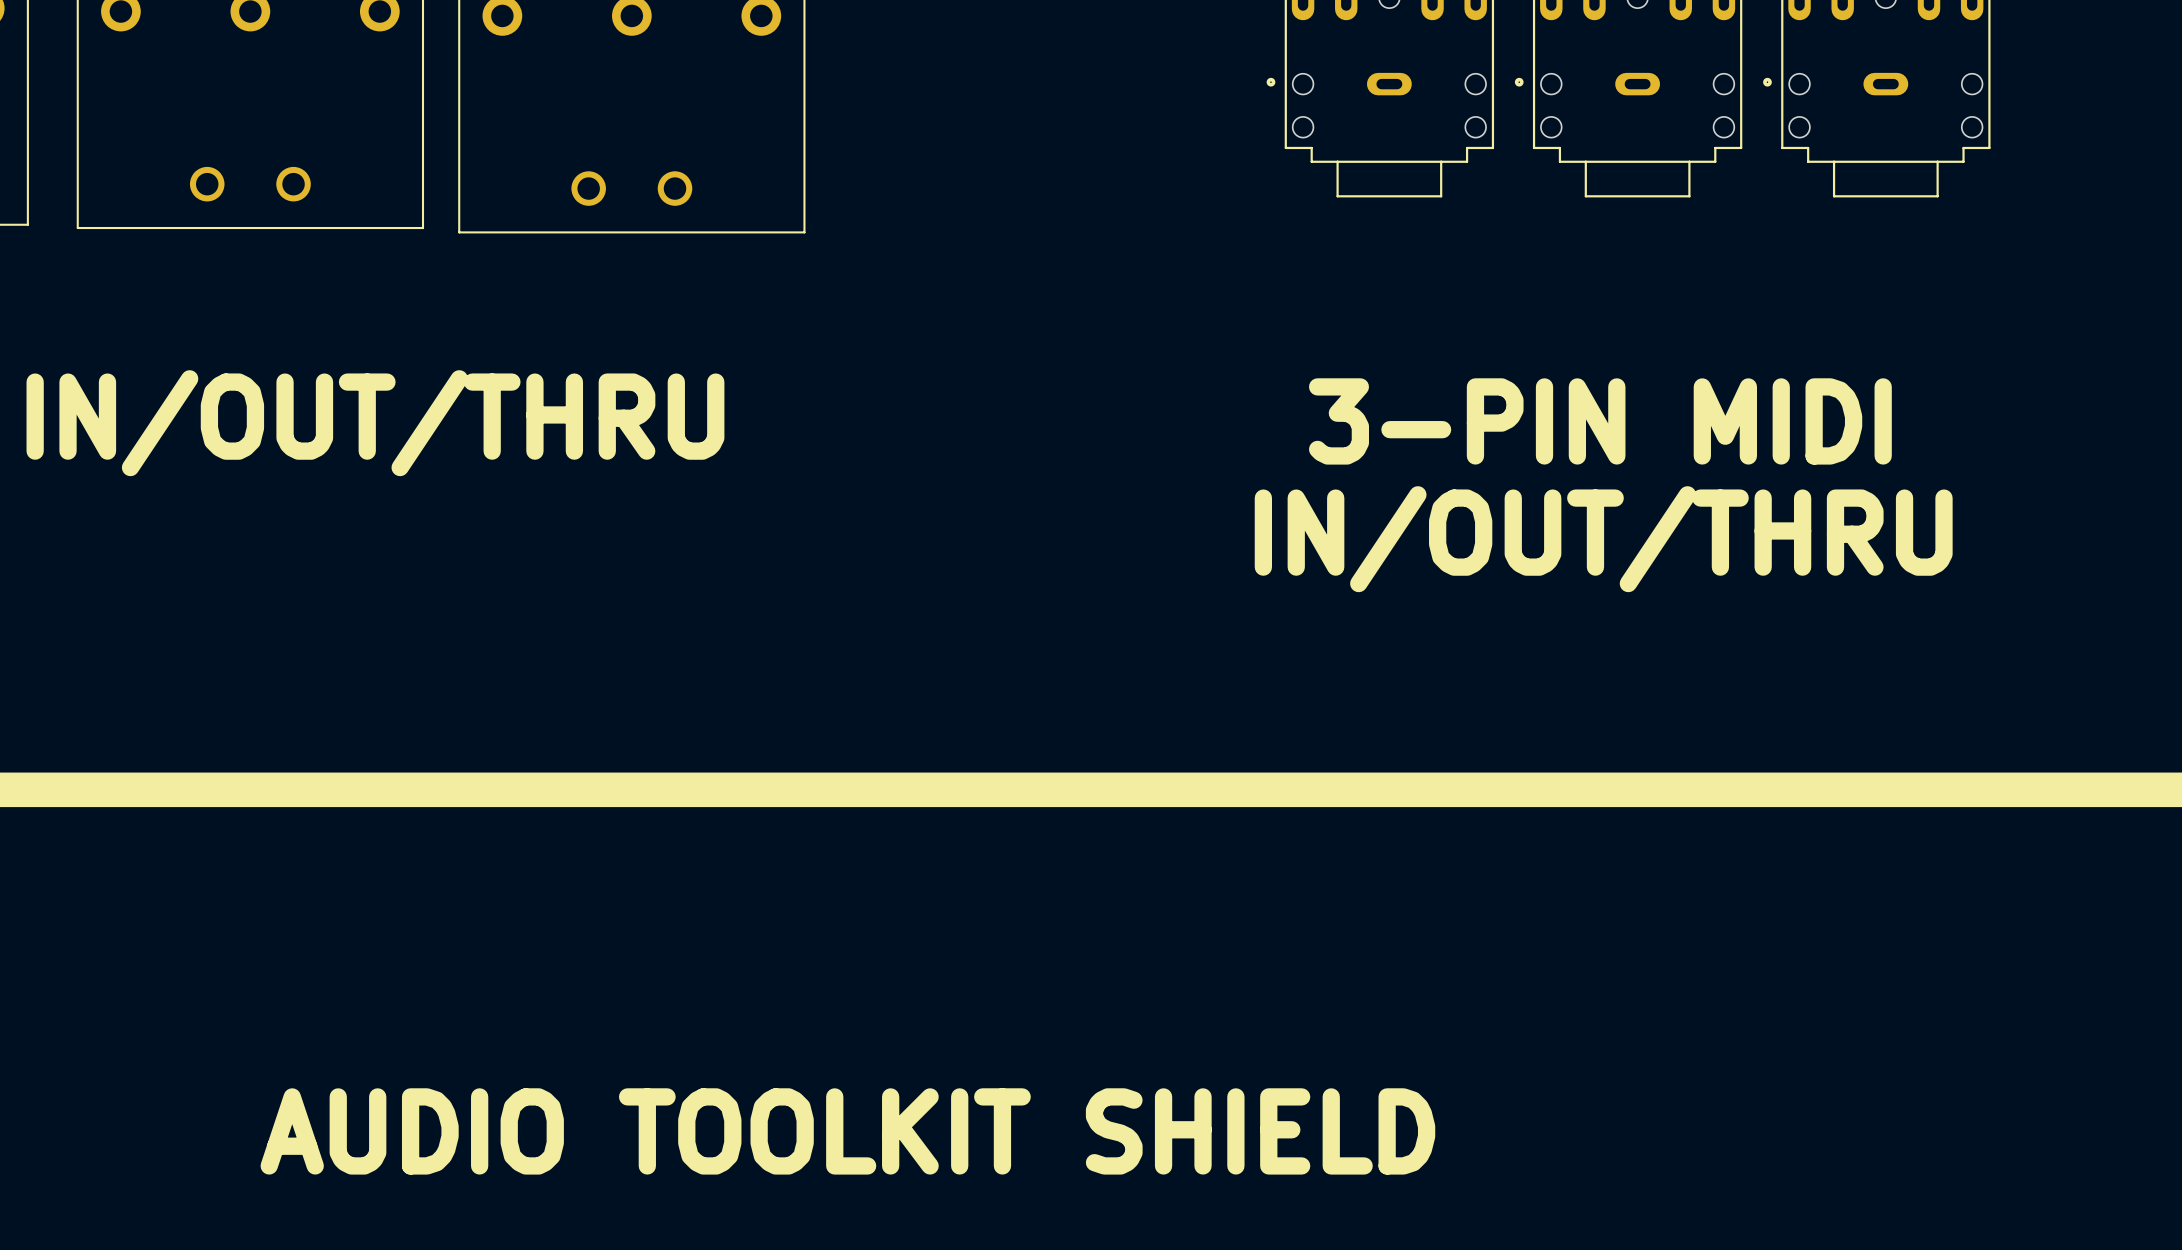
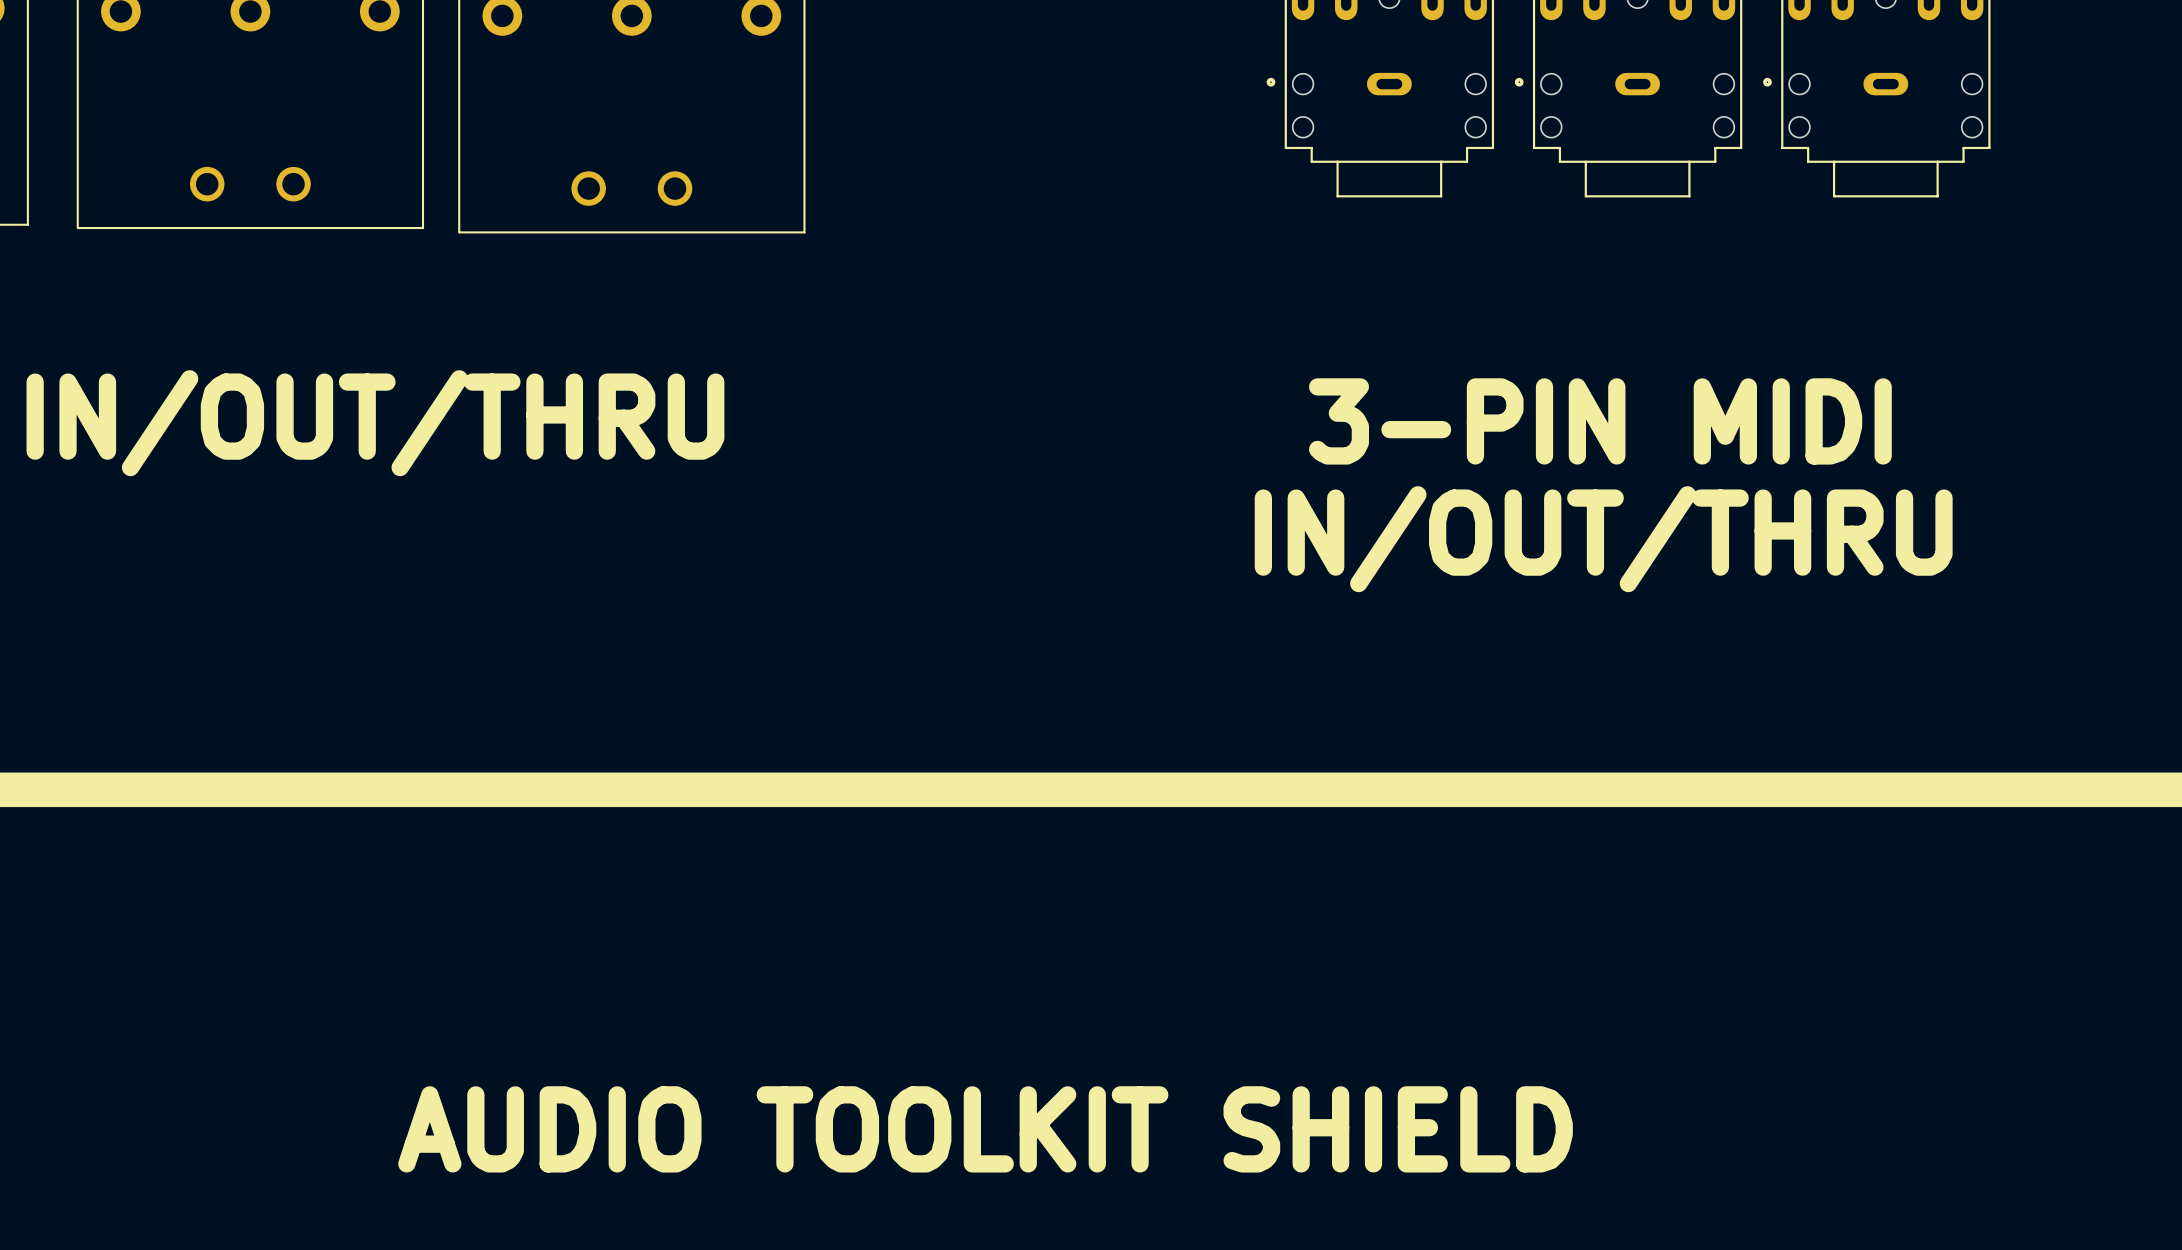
text position: AUDIO TOOLKIT SHIELD (847, 1131) -> AUDIO TOOLKIT SHIELD (985, 1129)

